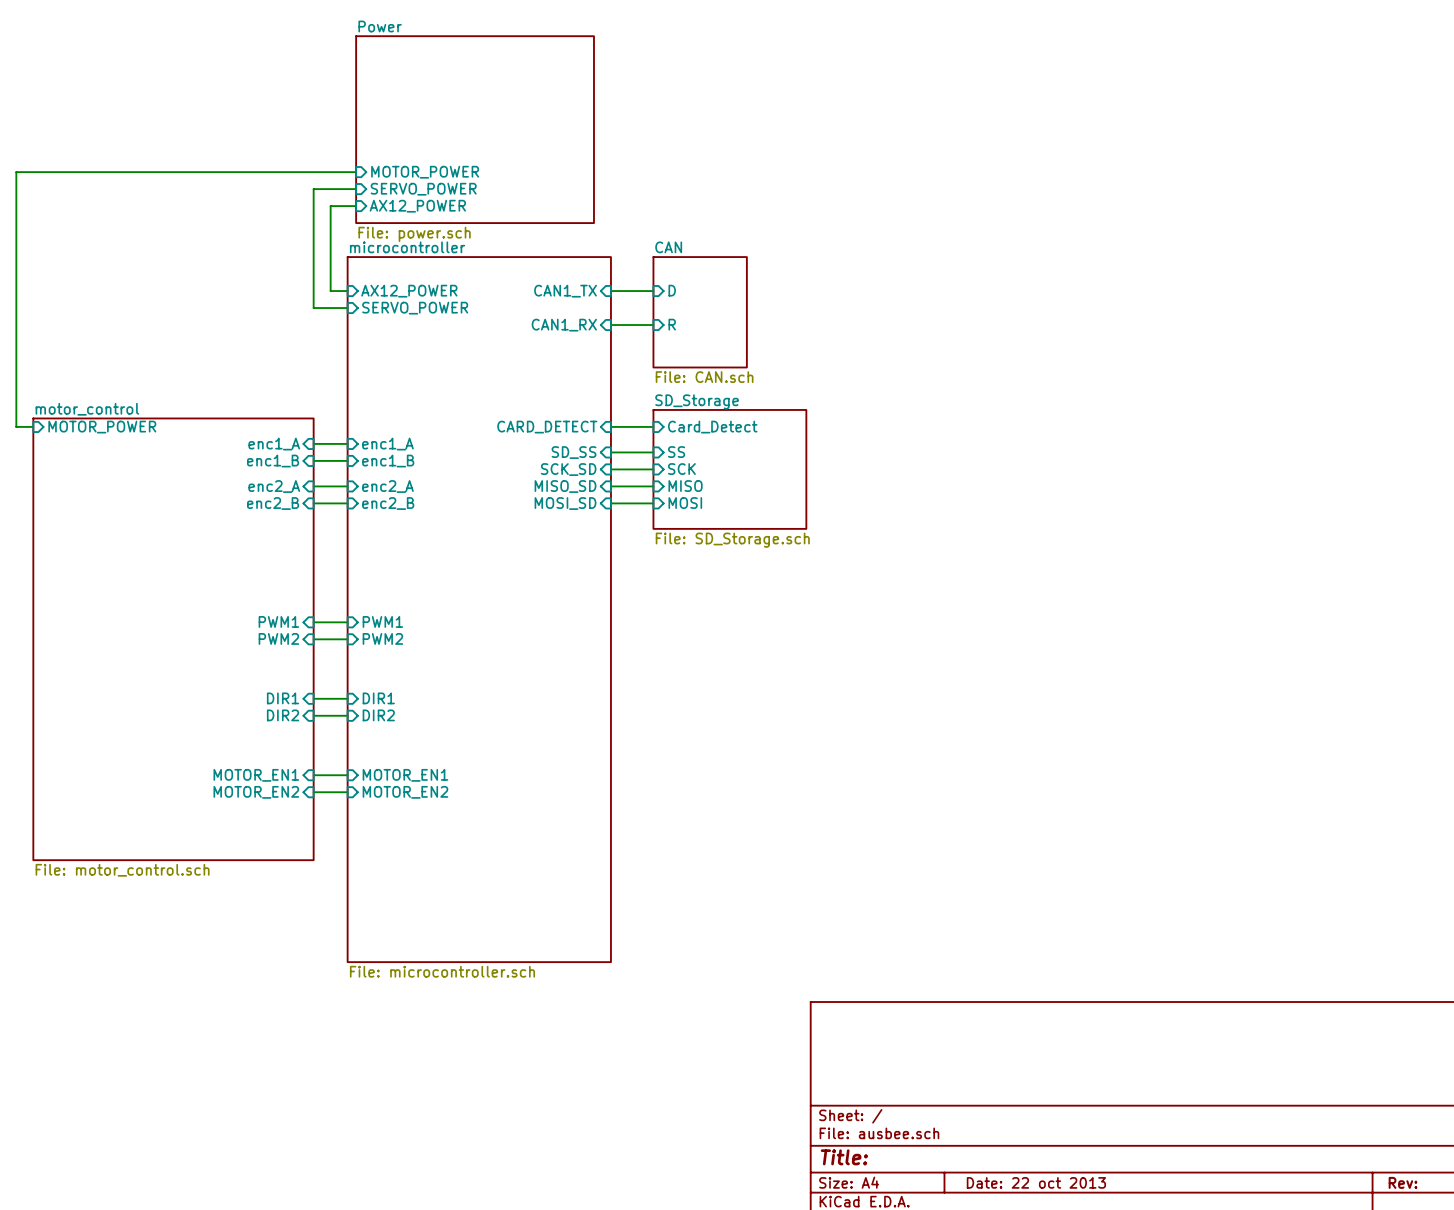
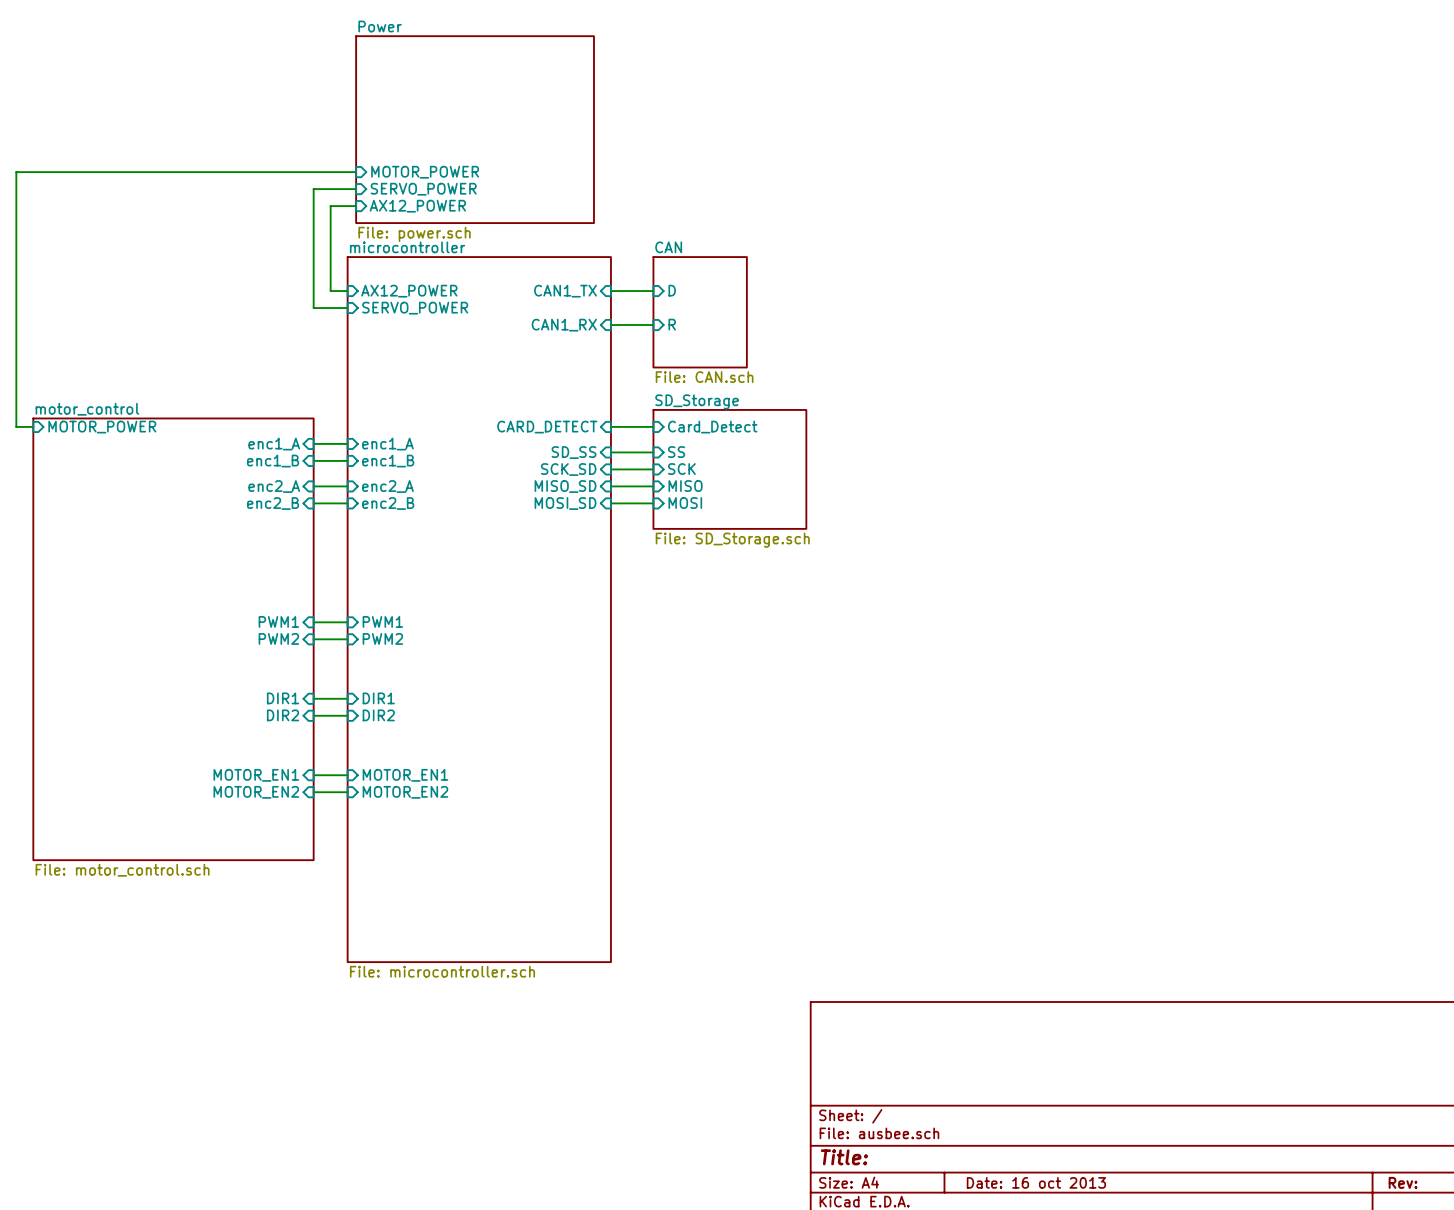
title block: Date: 22 oct 2013 (1036, 1182) -> Date: 16 oct 2013 (1036, 1182)

